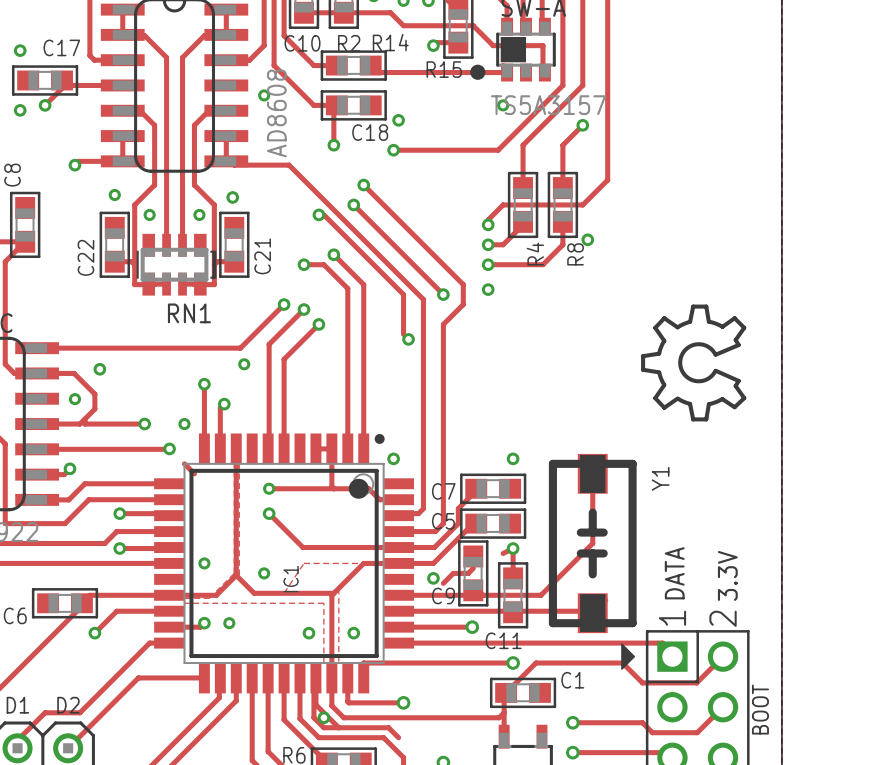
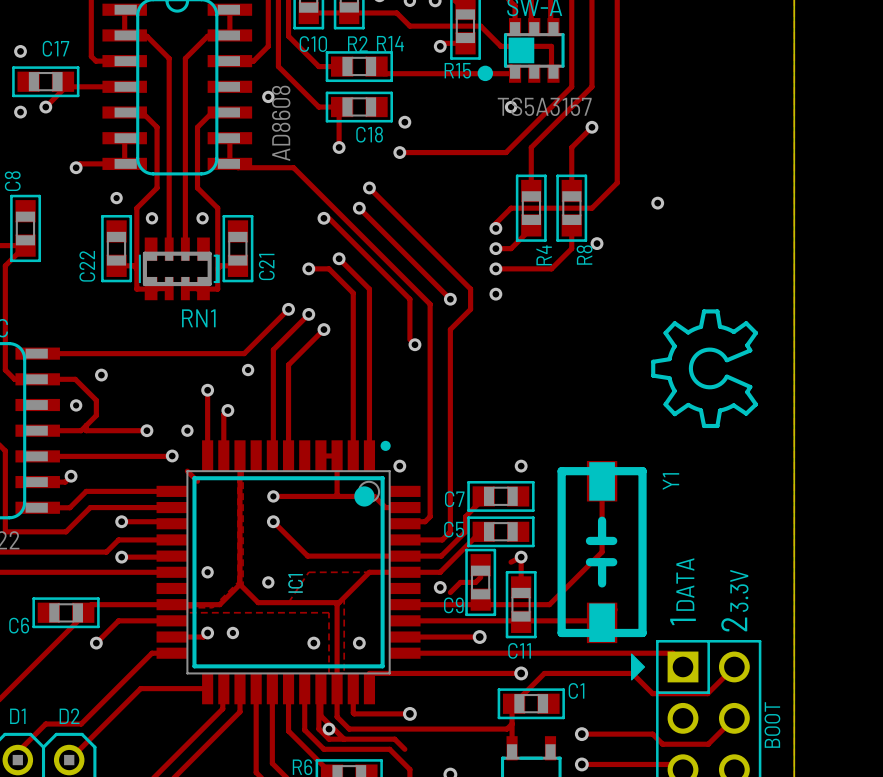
via: (232, 197) -> none
via: none -> (657, 203)

